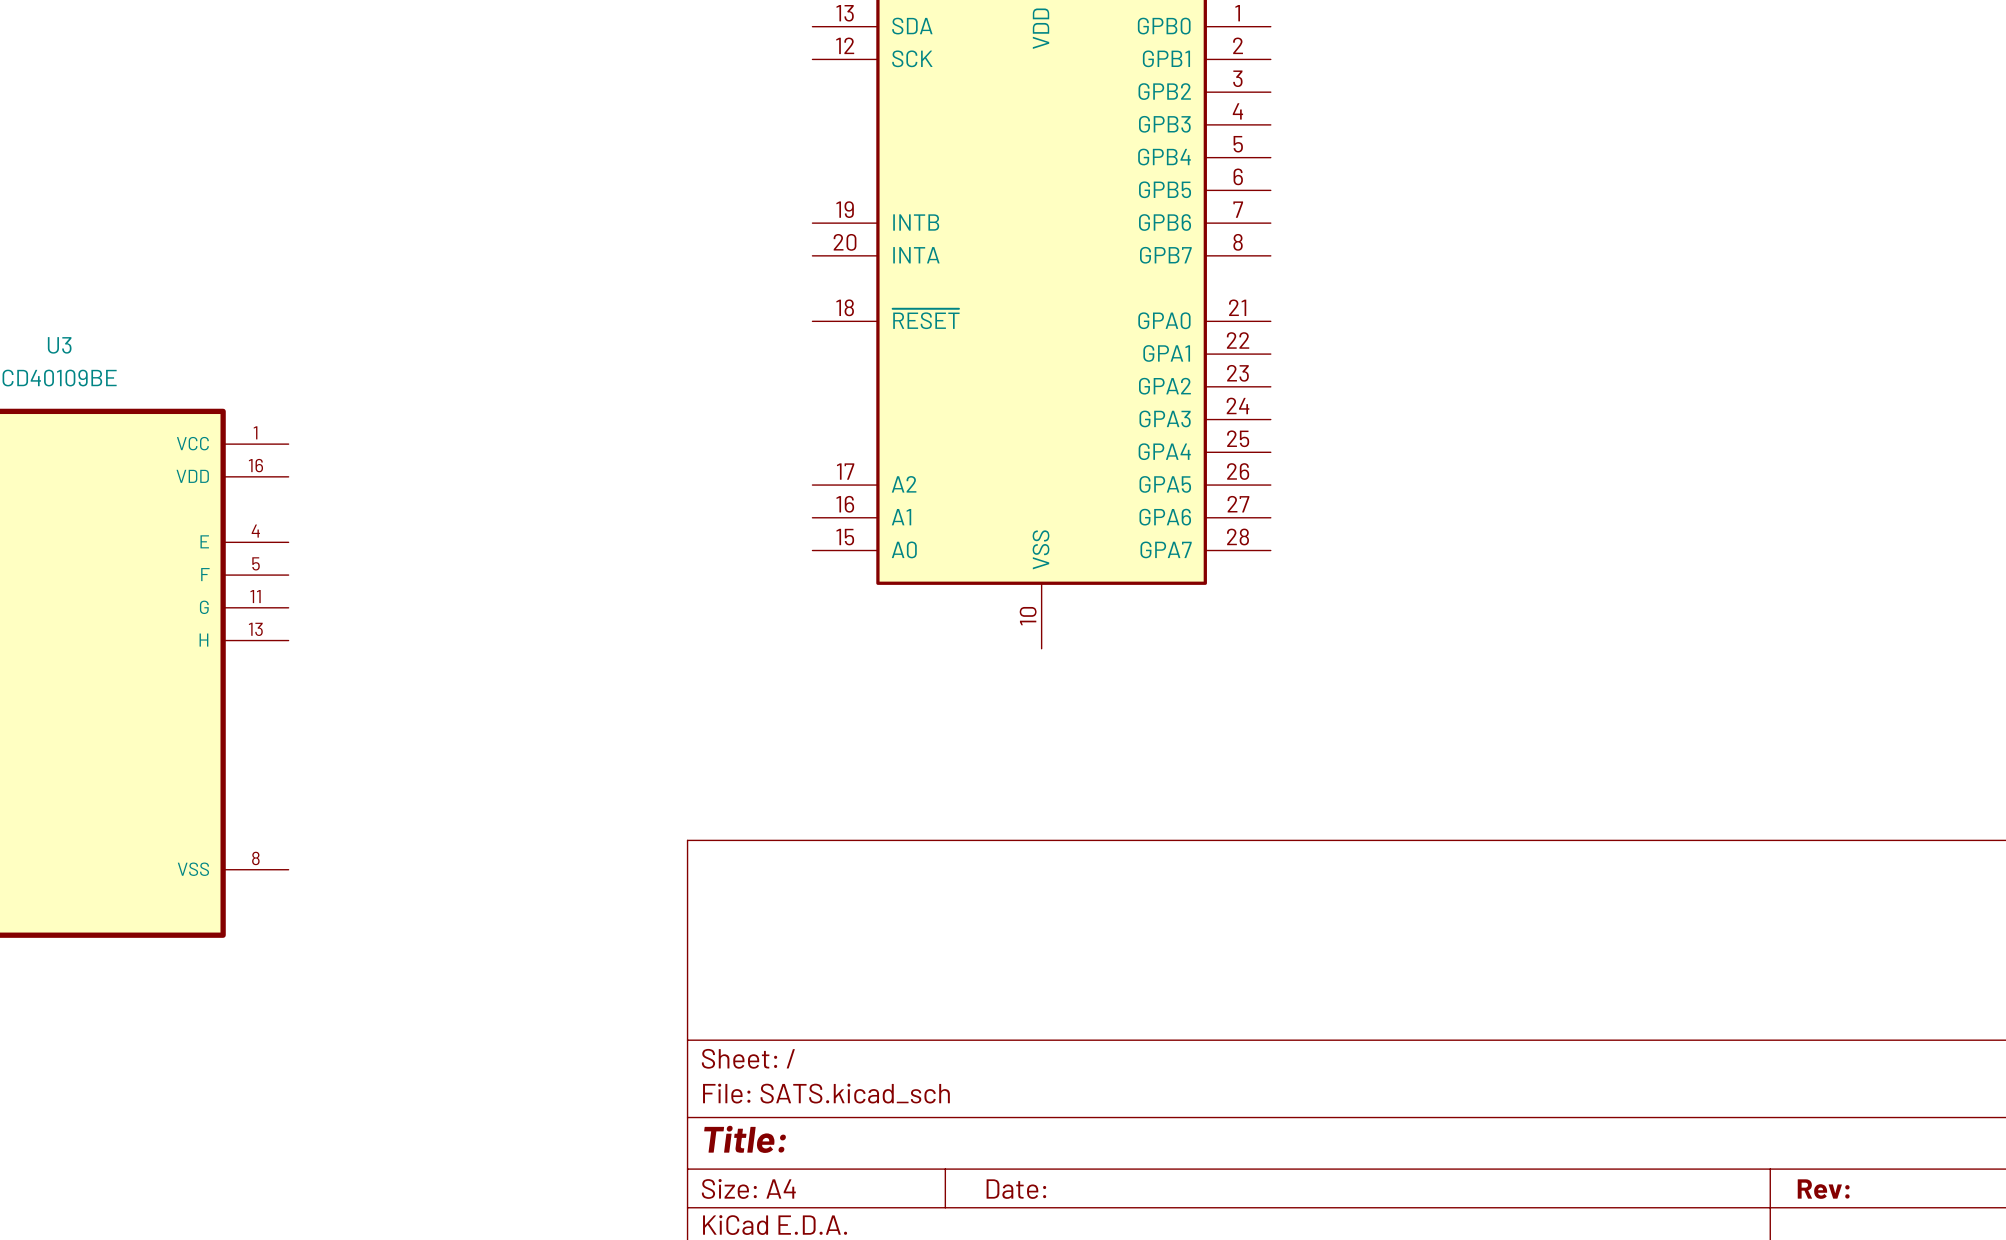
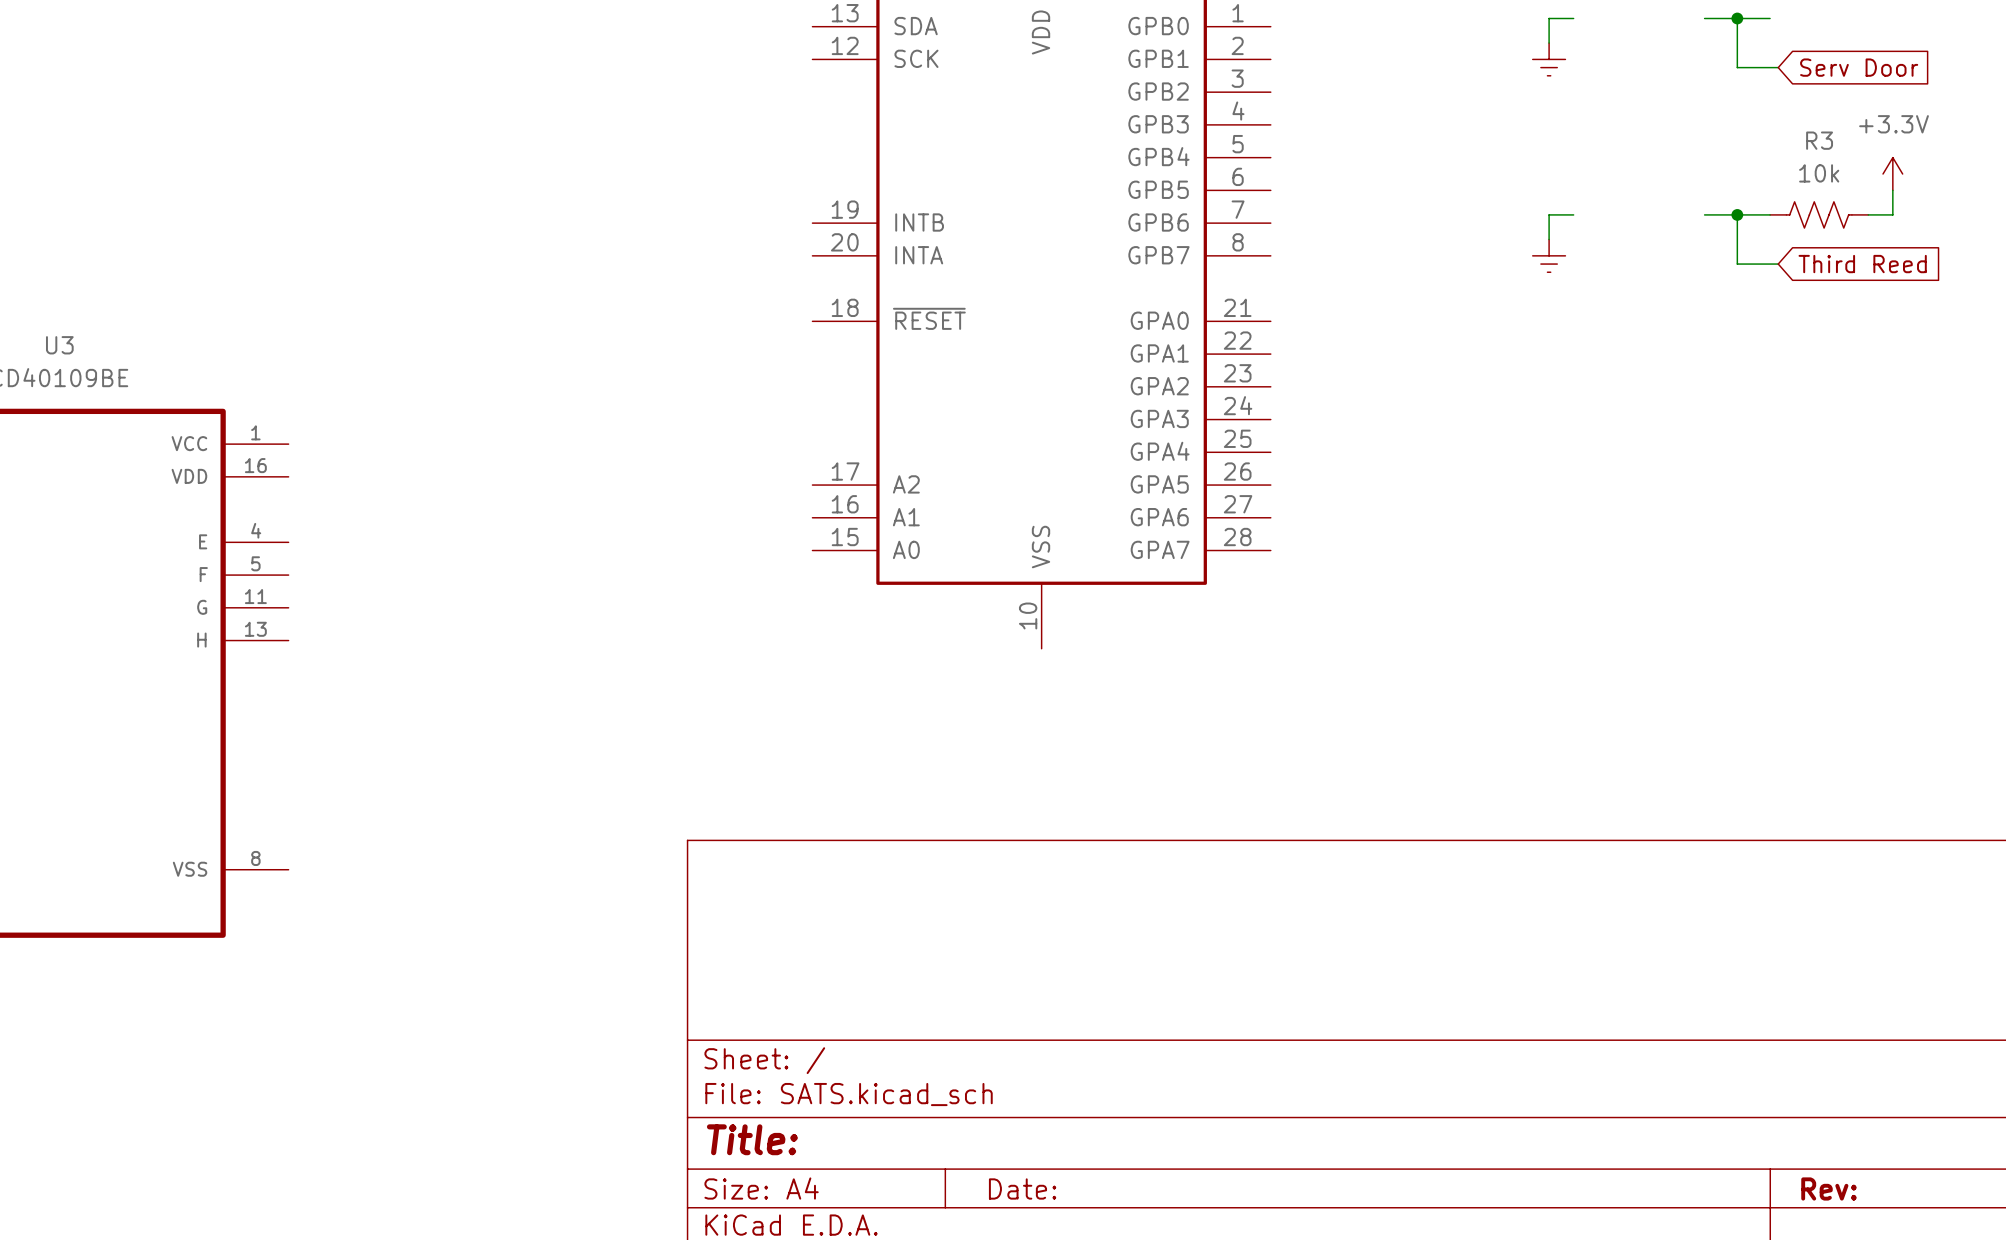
wire: none -> (1573, 18) (1549, 18) (1549, 43)
wire: none -> (1704, 18) (1770, 18)
wire: none -> (1737, 18) (1737, 67) (1778, 67)
junction: none -> (1737, 18)
power symbol: none -> (1549, 59)
global label: none -> Serv Door (1859, 67)
power symbol: none -> +3.3V (1892, 174)
wire: none -> (1892, 190) (1892, 214) (1868, 214)
wire: none -> (1573, 214) (1549, 214) (1549, 239)
wire: none -> (1704, 214) (1770, 214)
wire: none -> (1737, 214) (1737, 264) (1778, 264)
junction: none -> (1737, 214)
R3: none -> 10k (1819, 214)
power symbol: none -> (1549, 255)
global label: none -> Third Reed (1862, 264)

